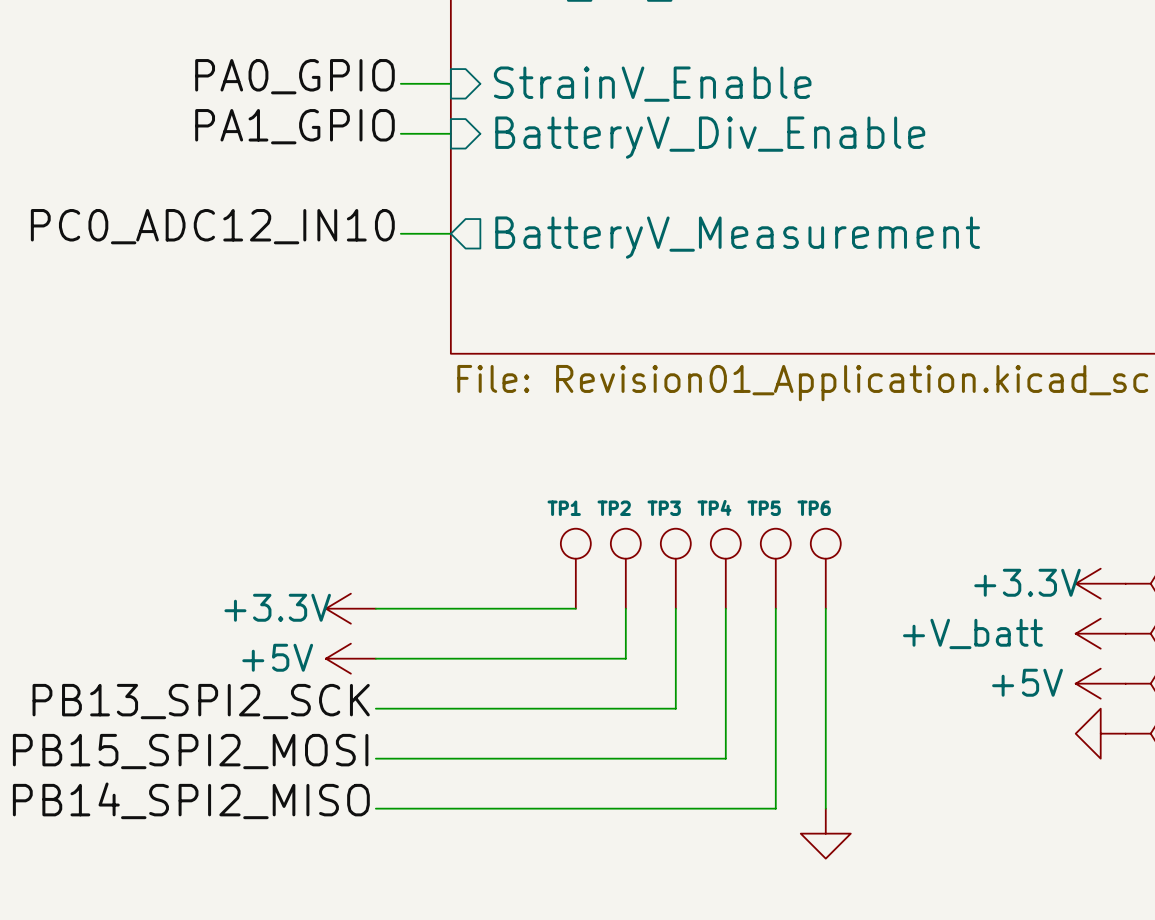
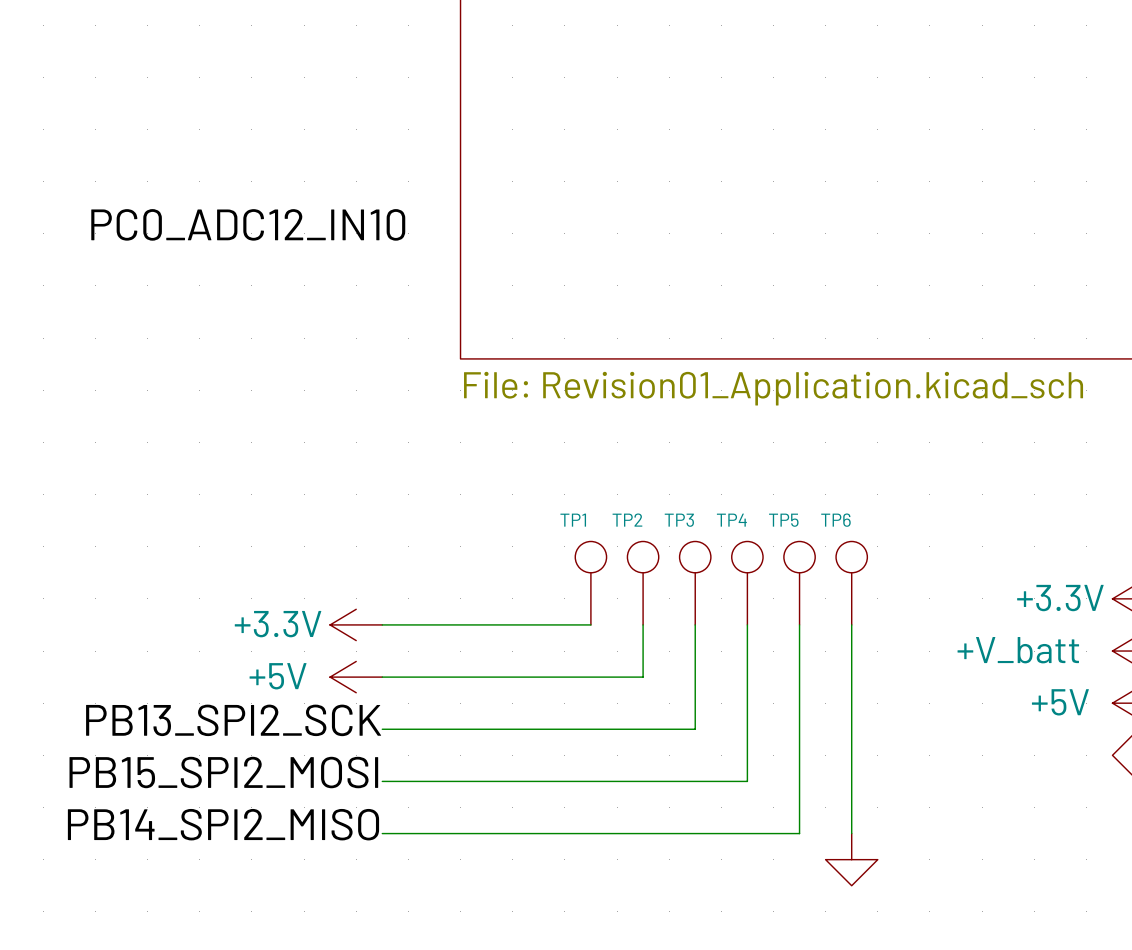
label: PA0_GPIO (294, 76) -> none
wire: (400, 83) (450, 83) -> none
sheet pin: StrainV_Enable (652, 84) -> none
label: PA1_GPIO (294, 126) -> none
wire: (400, 133) (450, 133) -> none
sheet pin: BatteryV_Div_Enable (710, 137) -> none
wire: (400, 233) (450, 233) -> none
sheet pin: BatteryV_Measurement (737, 237) -> none

